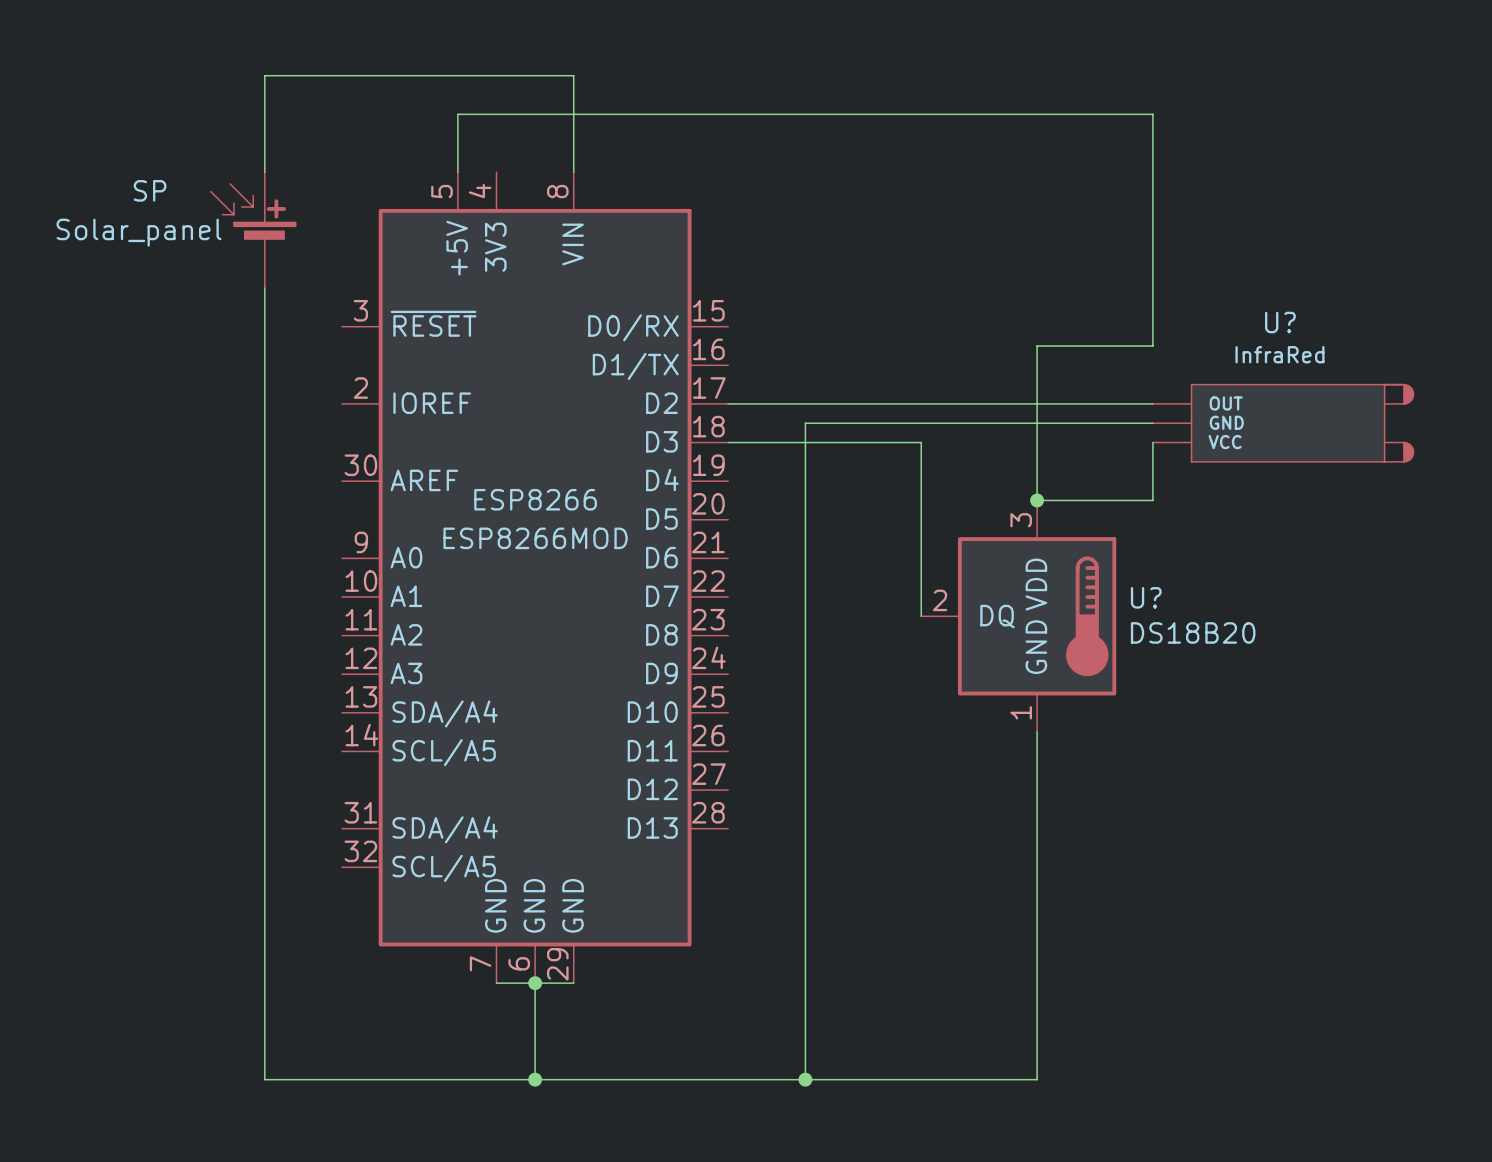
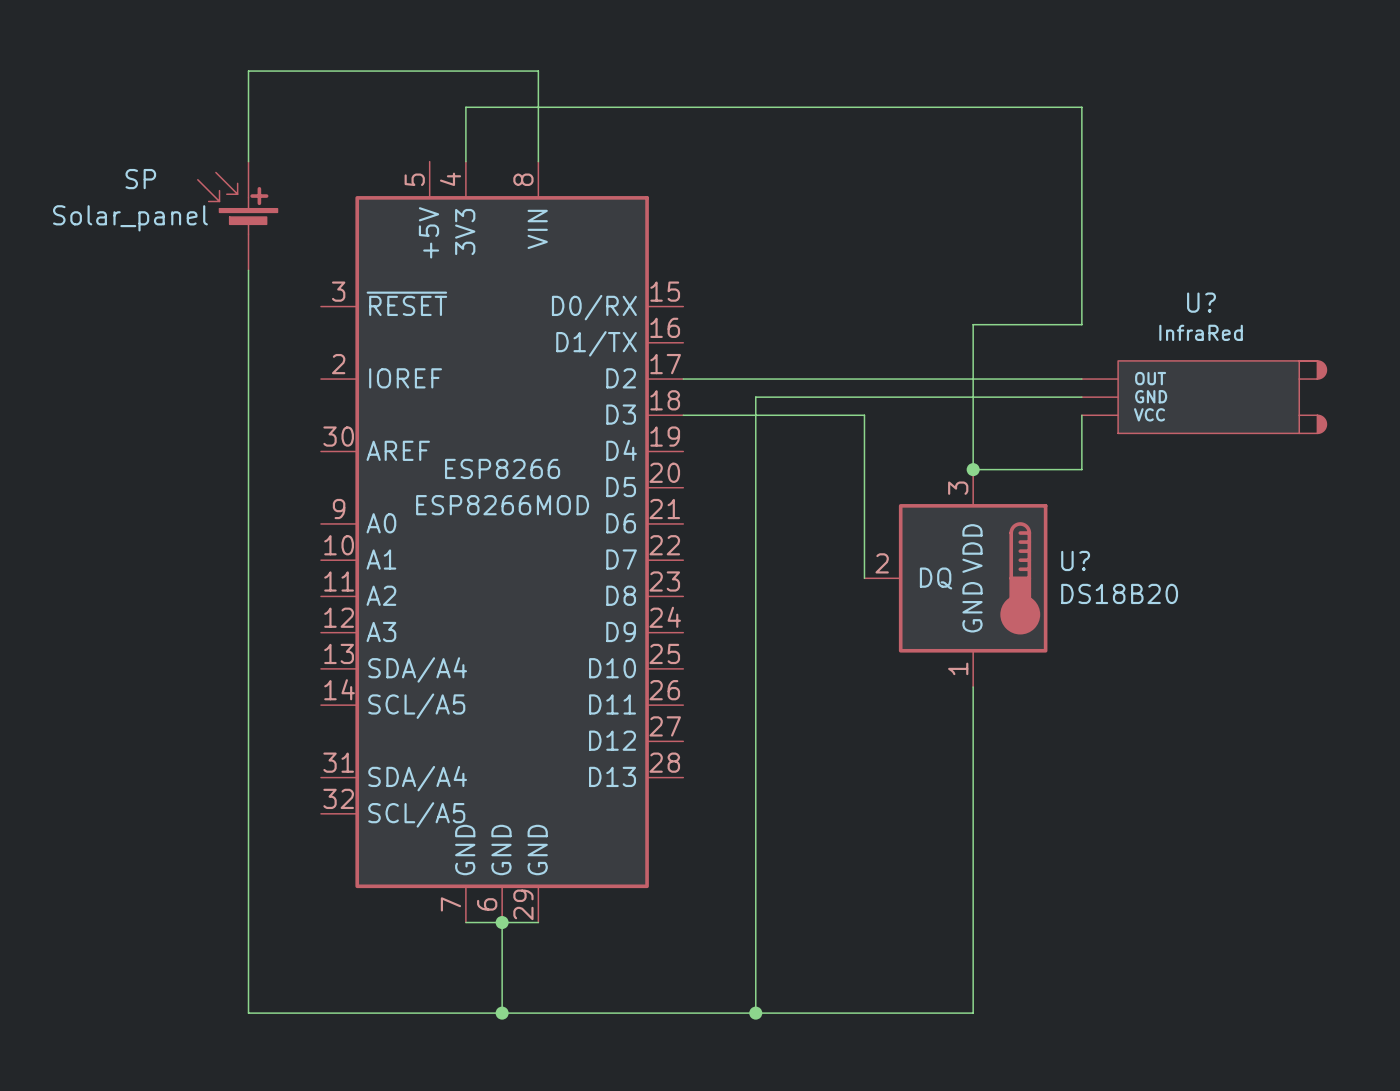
wire: (496, 114) (457, 114) (457, 172) -> (465, 107) (465, 161)

